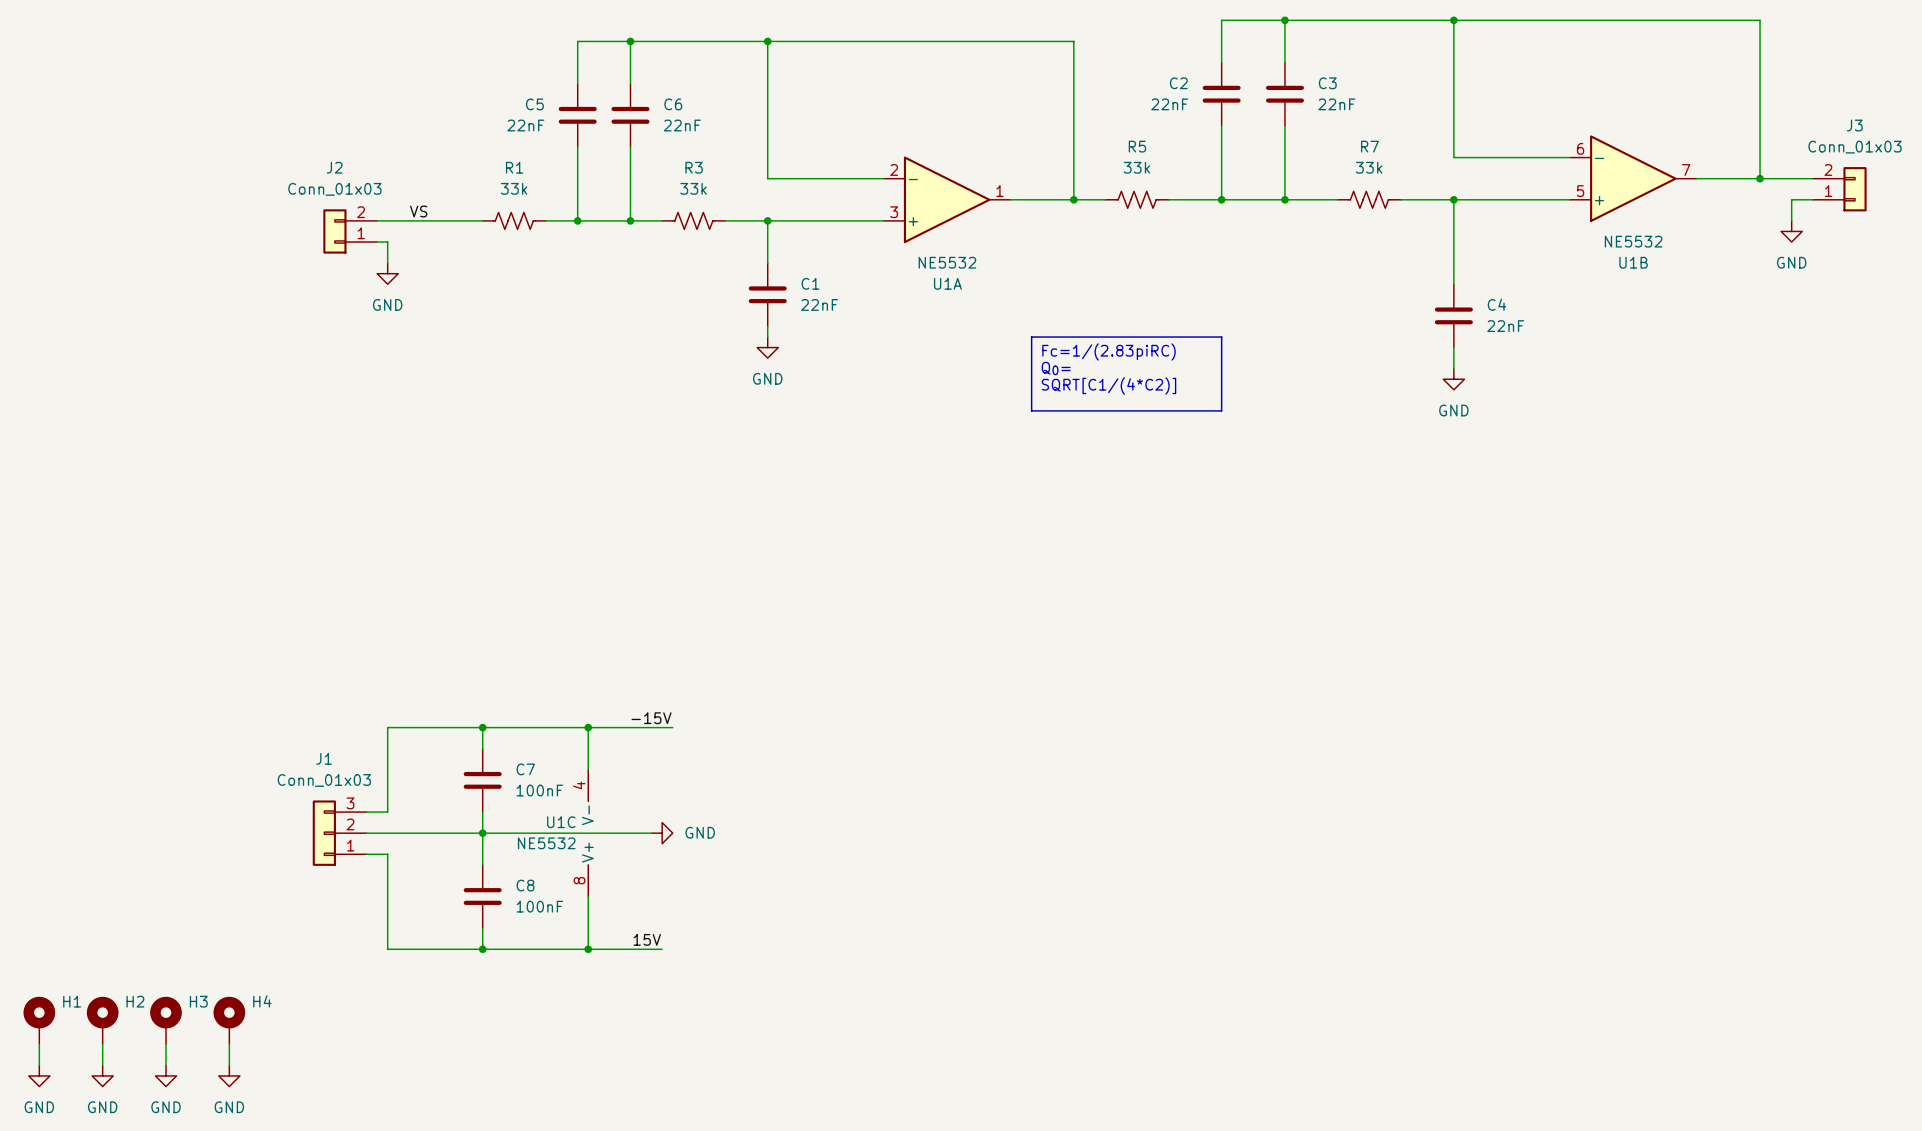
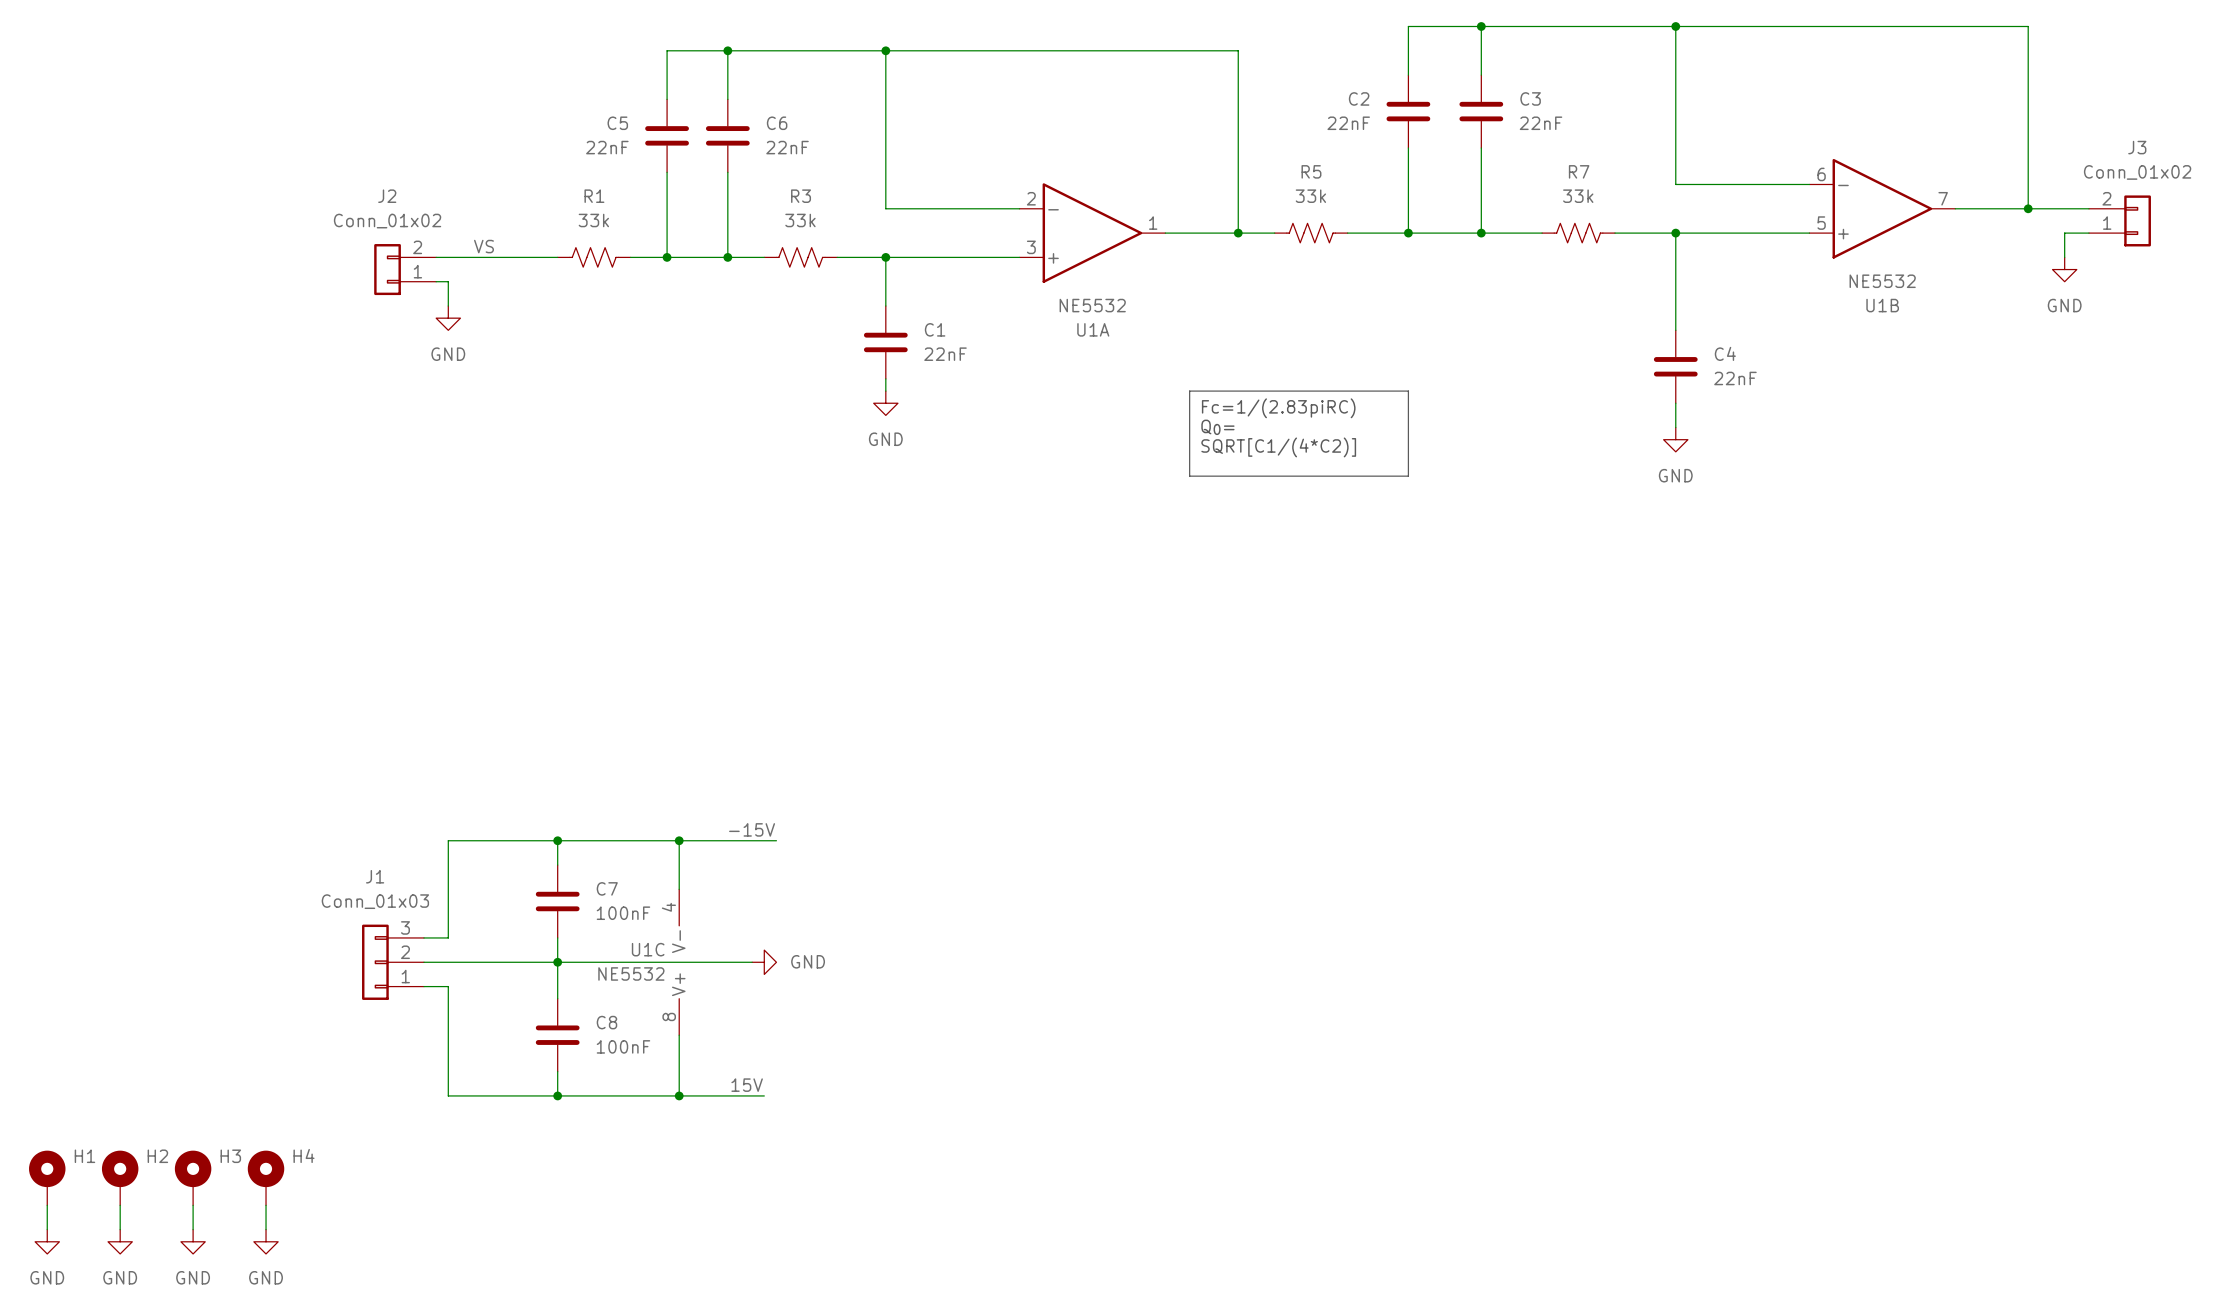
J3 value: Conn_01x03 (1855, 147) -> Conn_01x02 (2137, 172)
J2 value: Conn_01x03 (334, 189) -> Conn_01x02 (387, 221)

